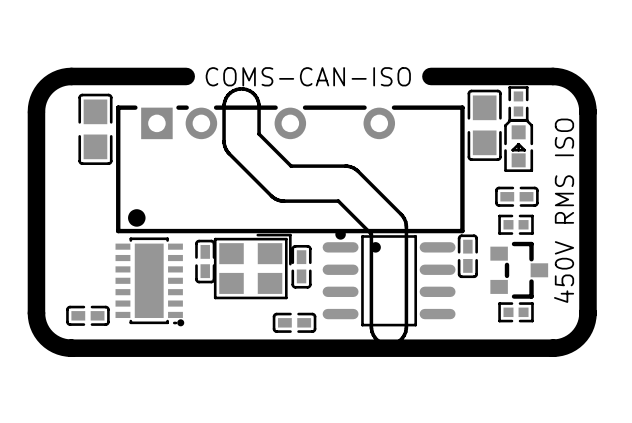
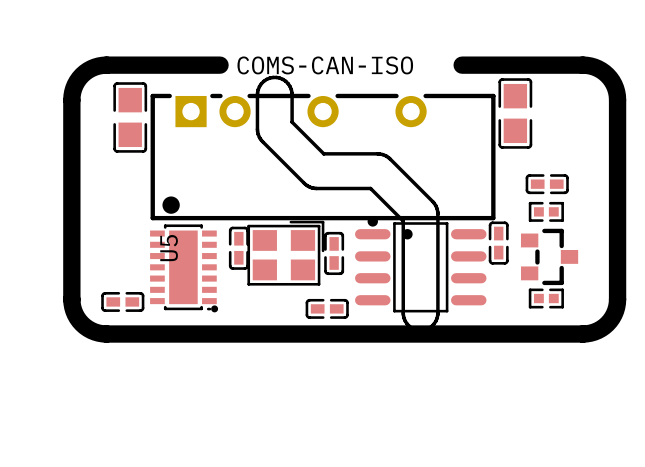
part: (518, 103) -> none
part: (518, 145) -> none
text: 450V RMS ISO (564, 210) -> none
U5 name: none -> U5 (169, 248)

